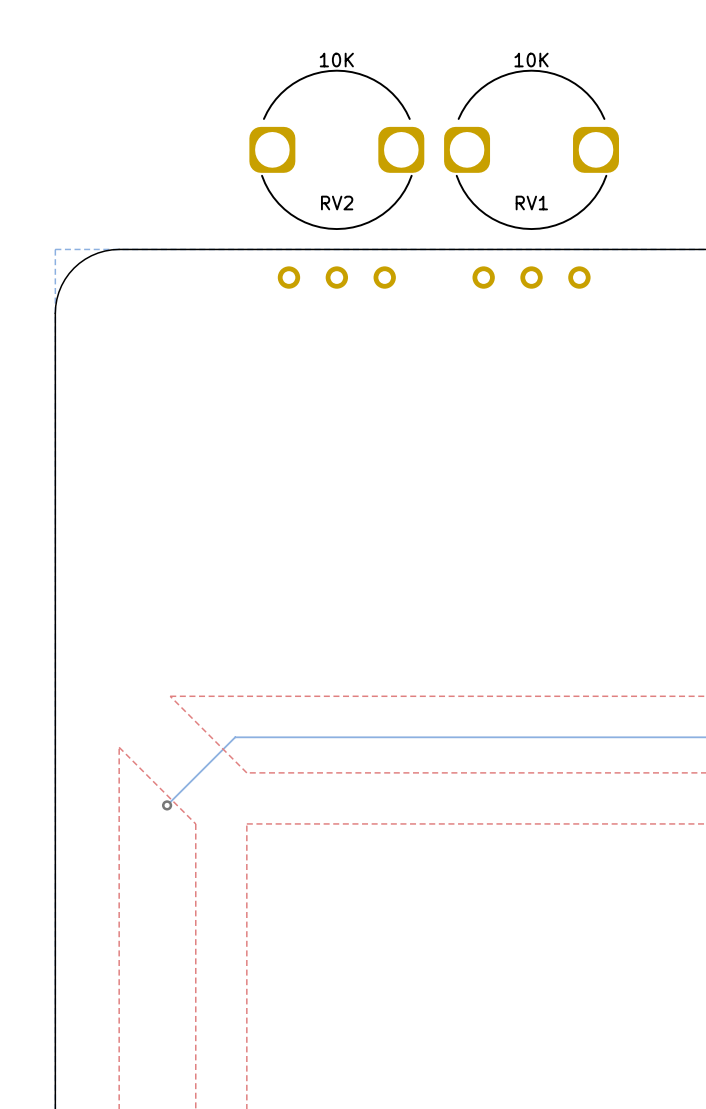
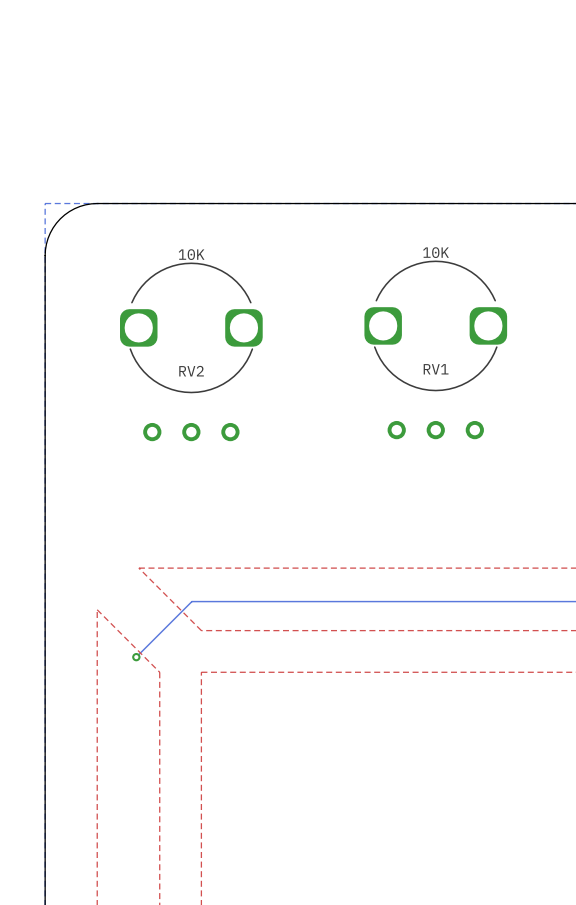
RV2 position: (336, 179) -> (191, 351)
RV1 position: (531, 179) -> (435, 349)

